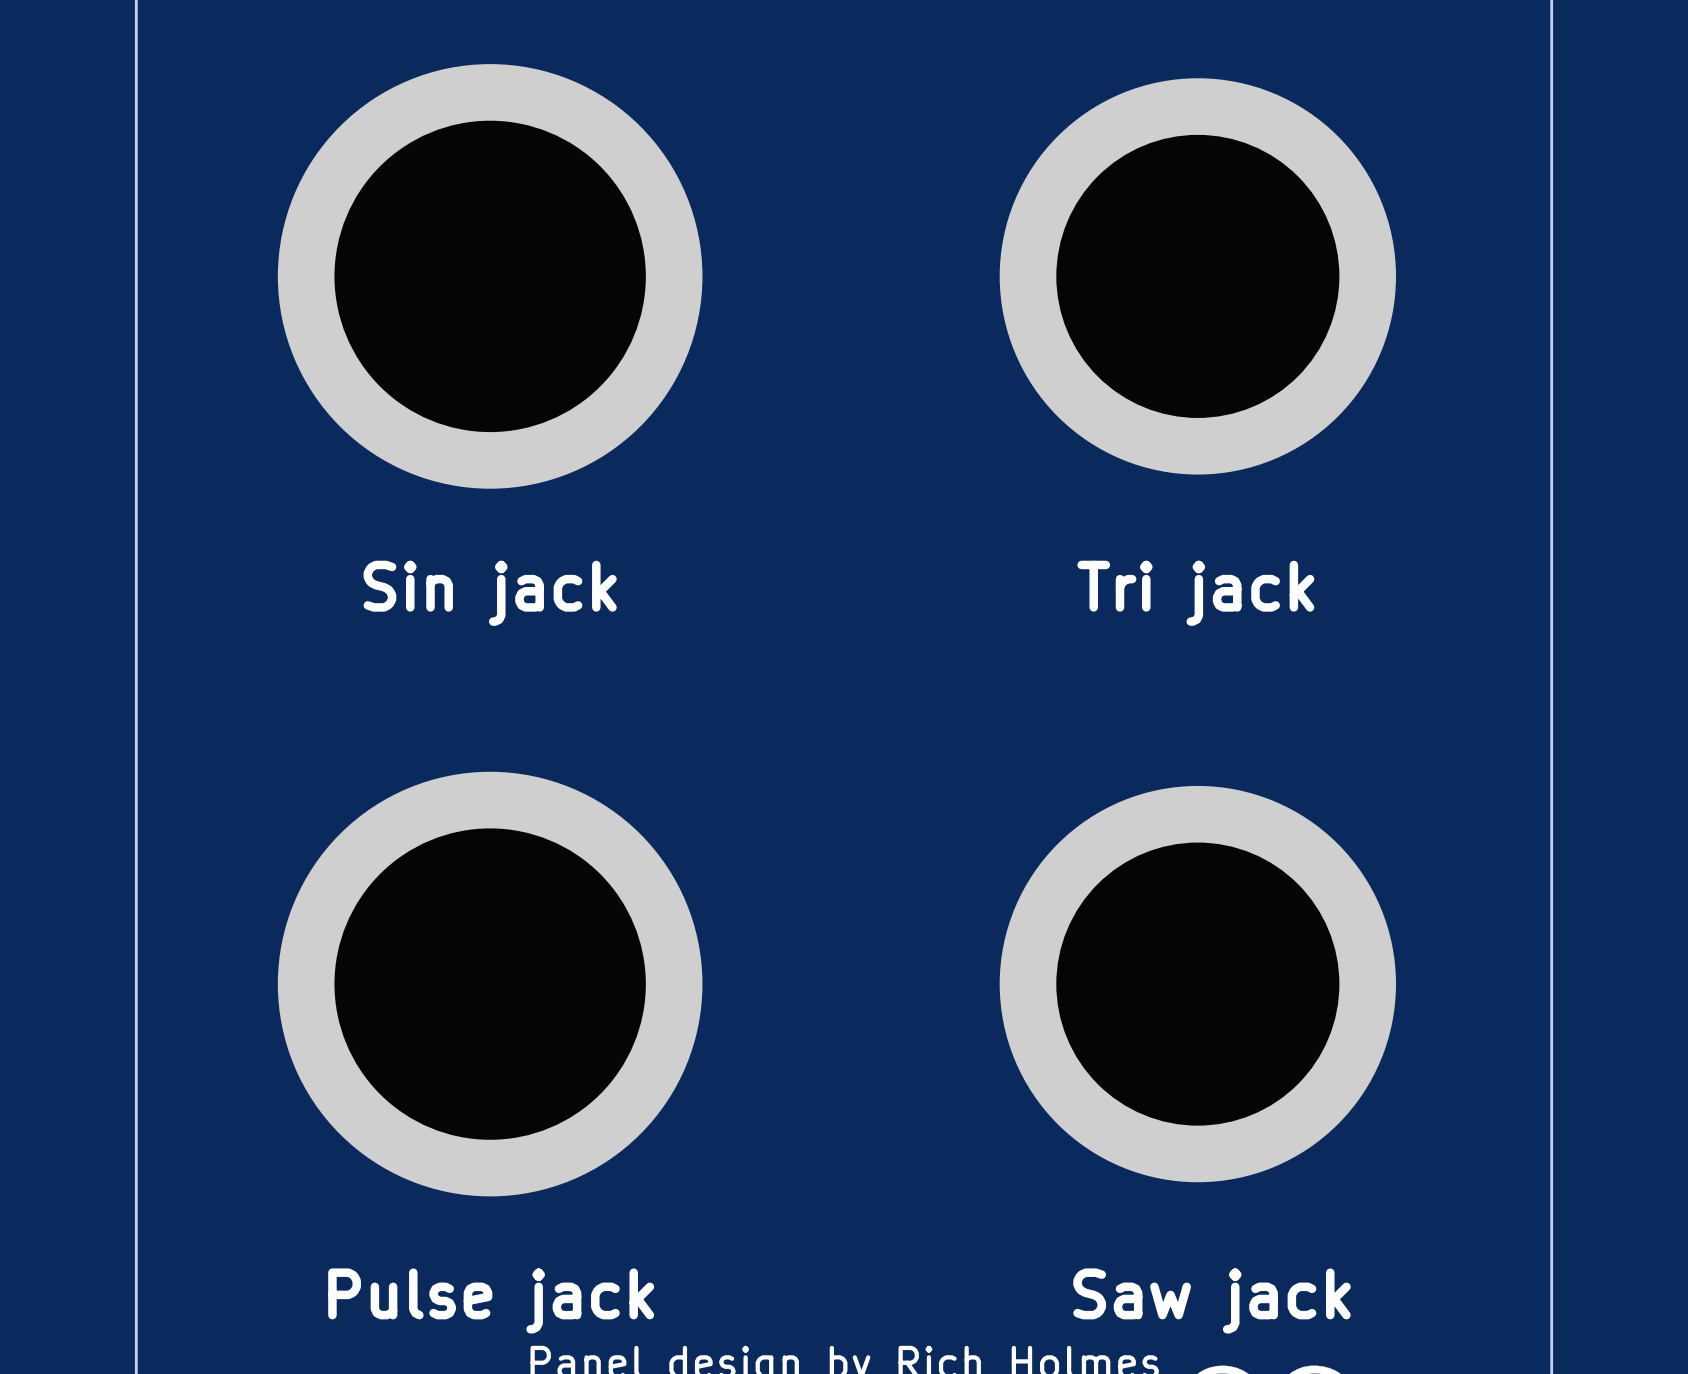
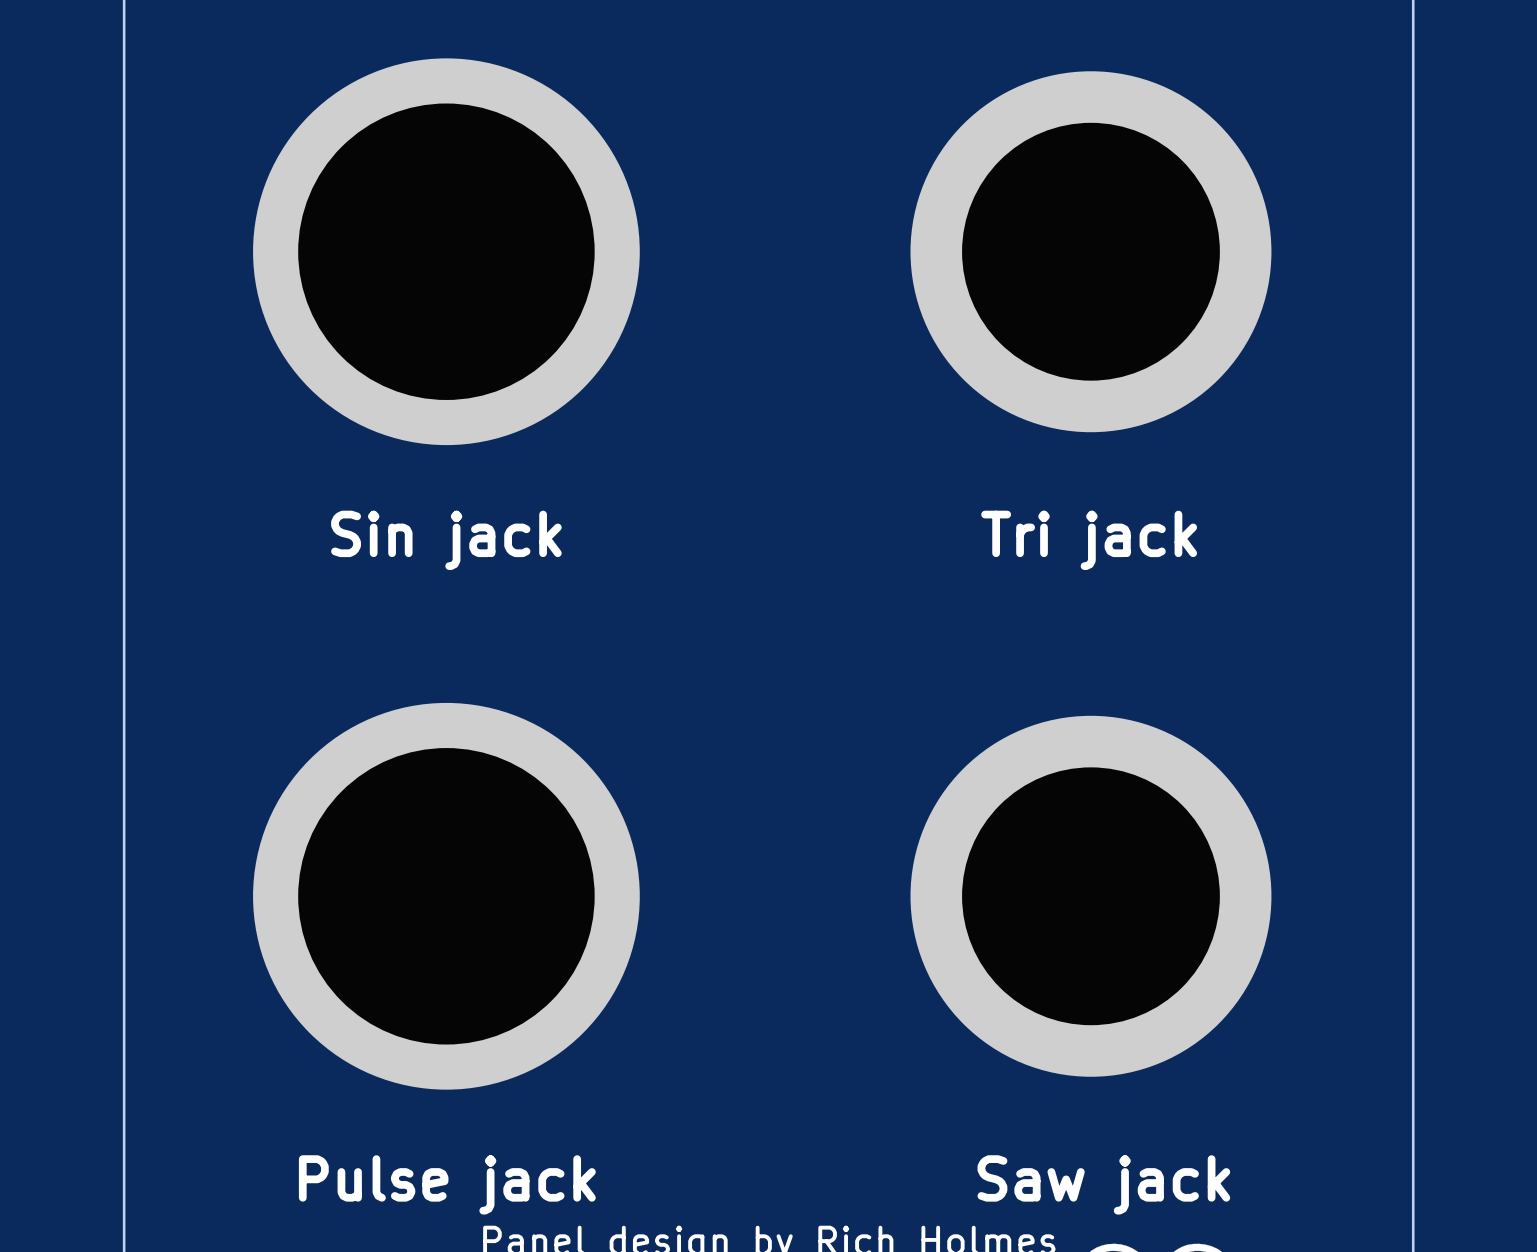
part footprint: [277, 64, 703, 489] -> [253, 58, 640, 446]
part footprint: [277, 771, 703, 1197] -> [253, 702, 640, 1090]

